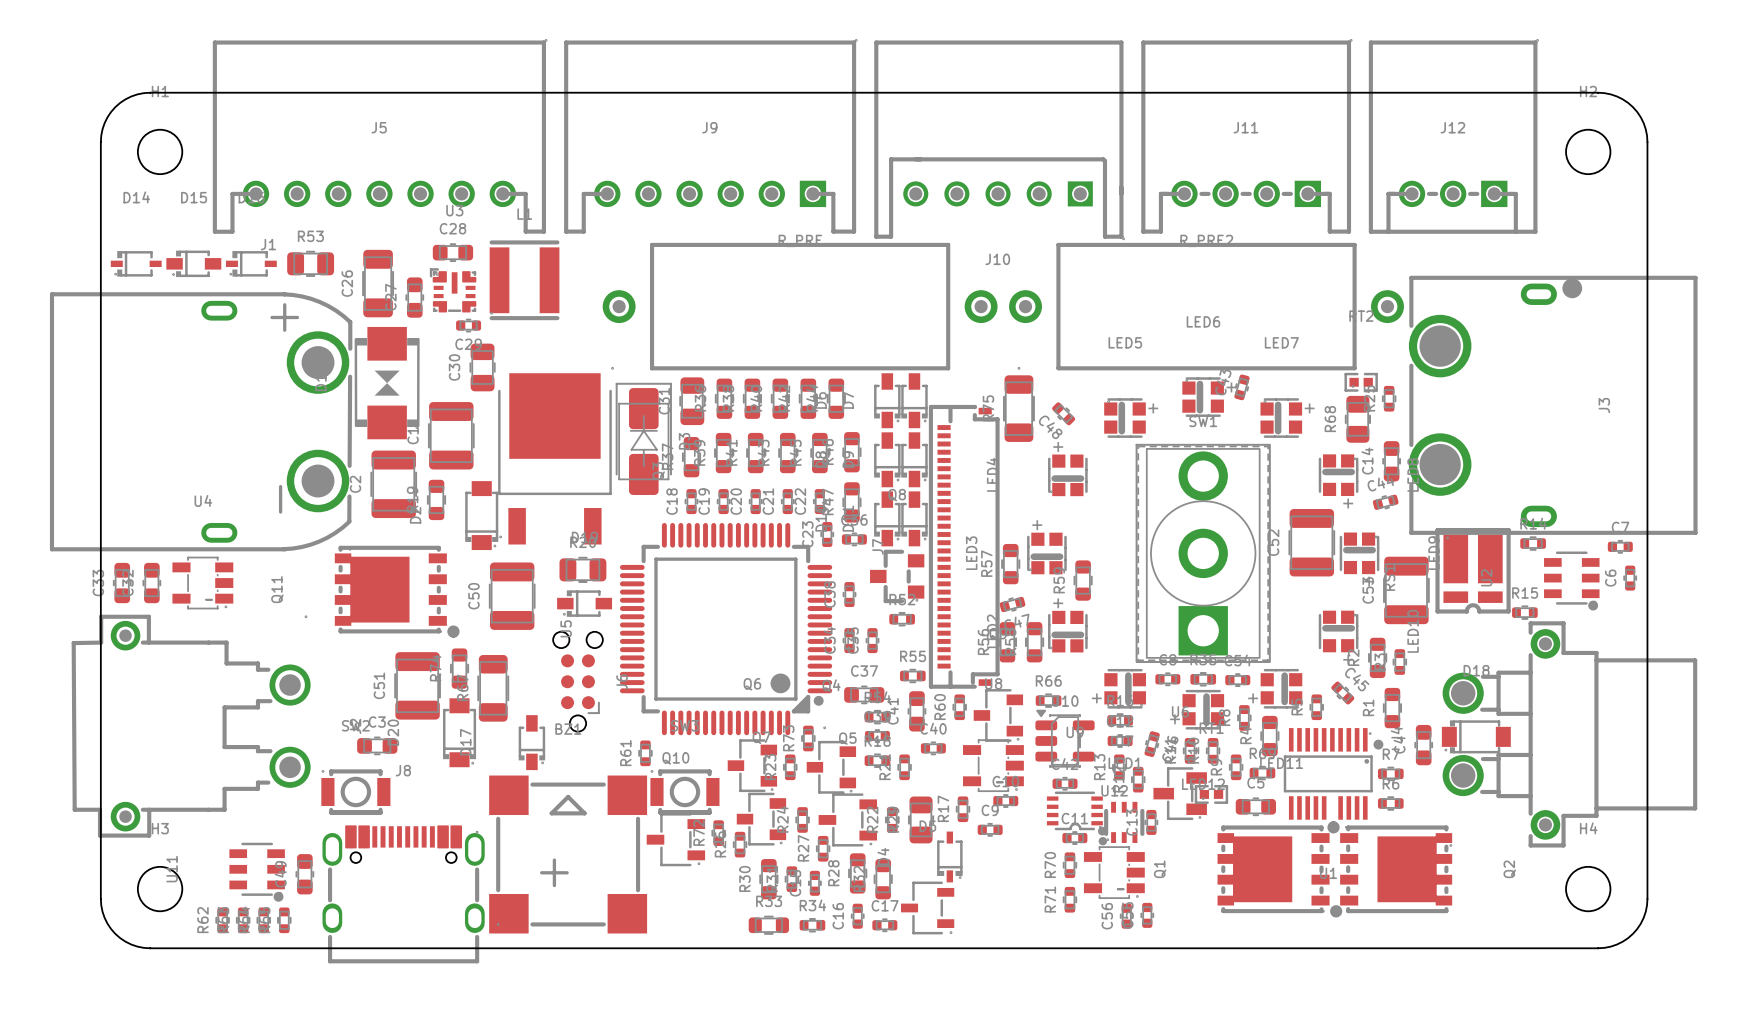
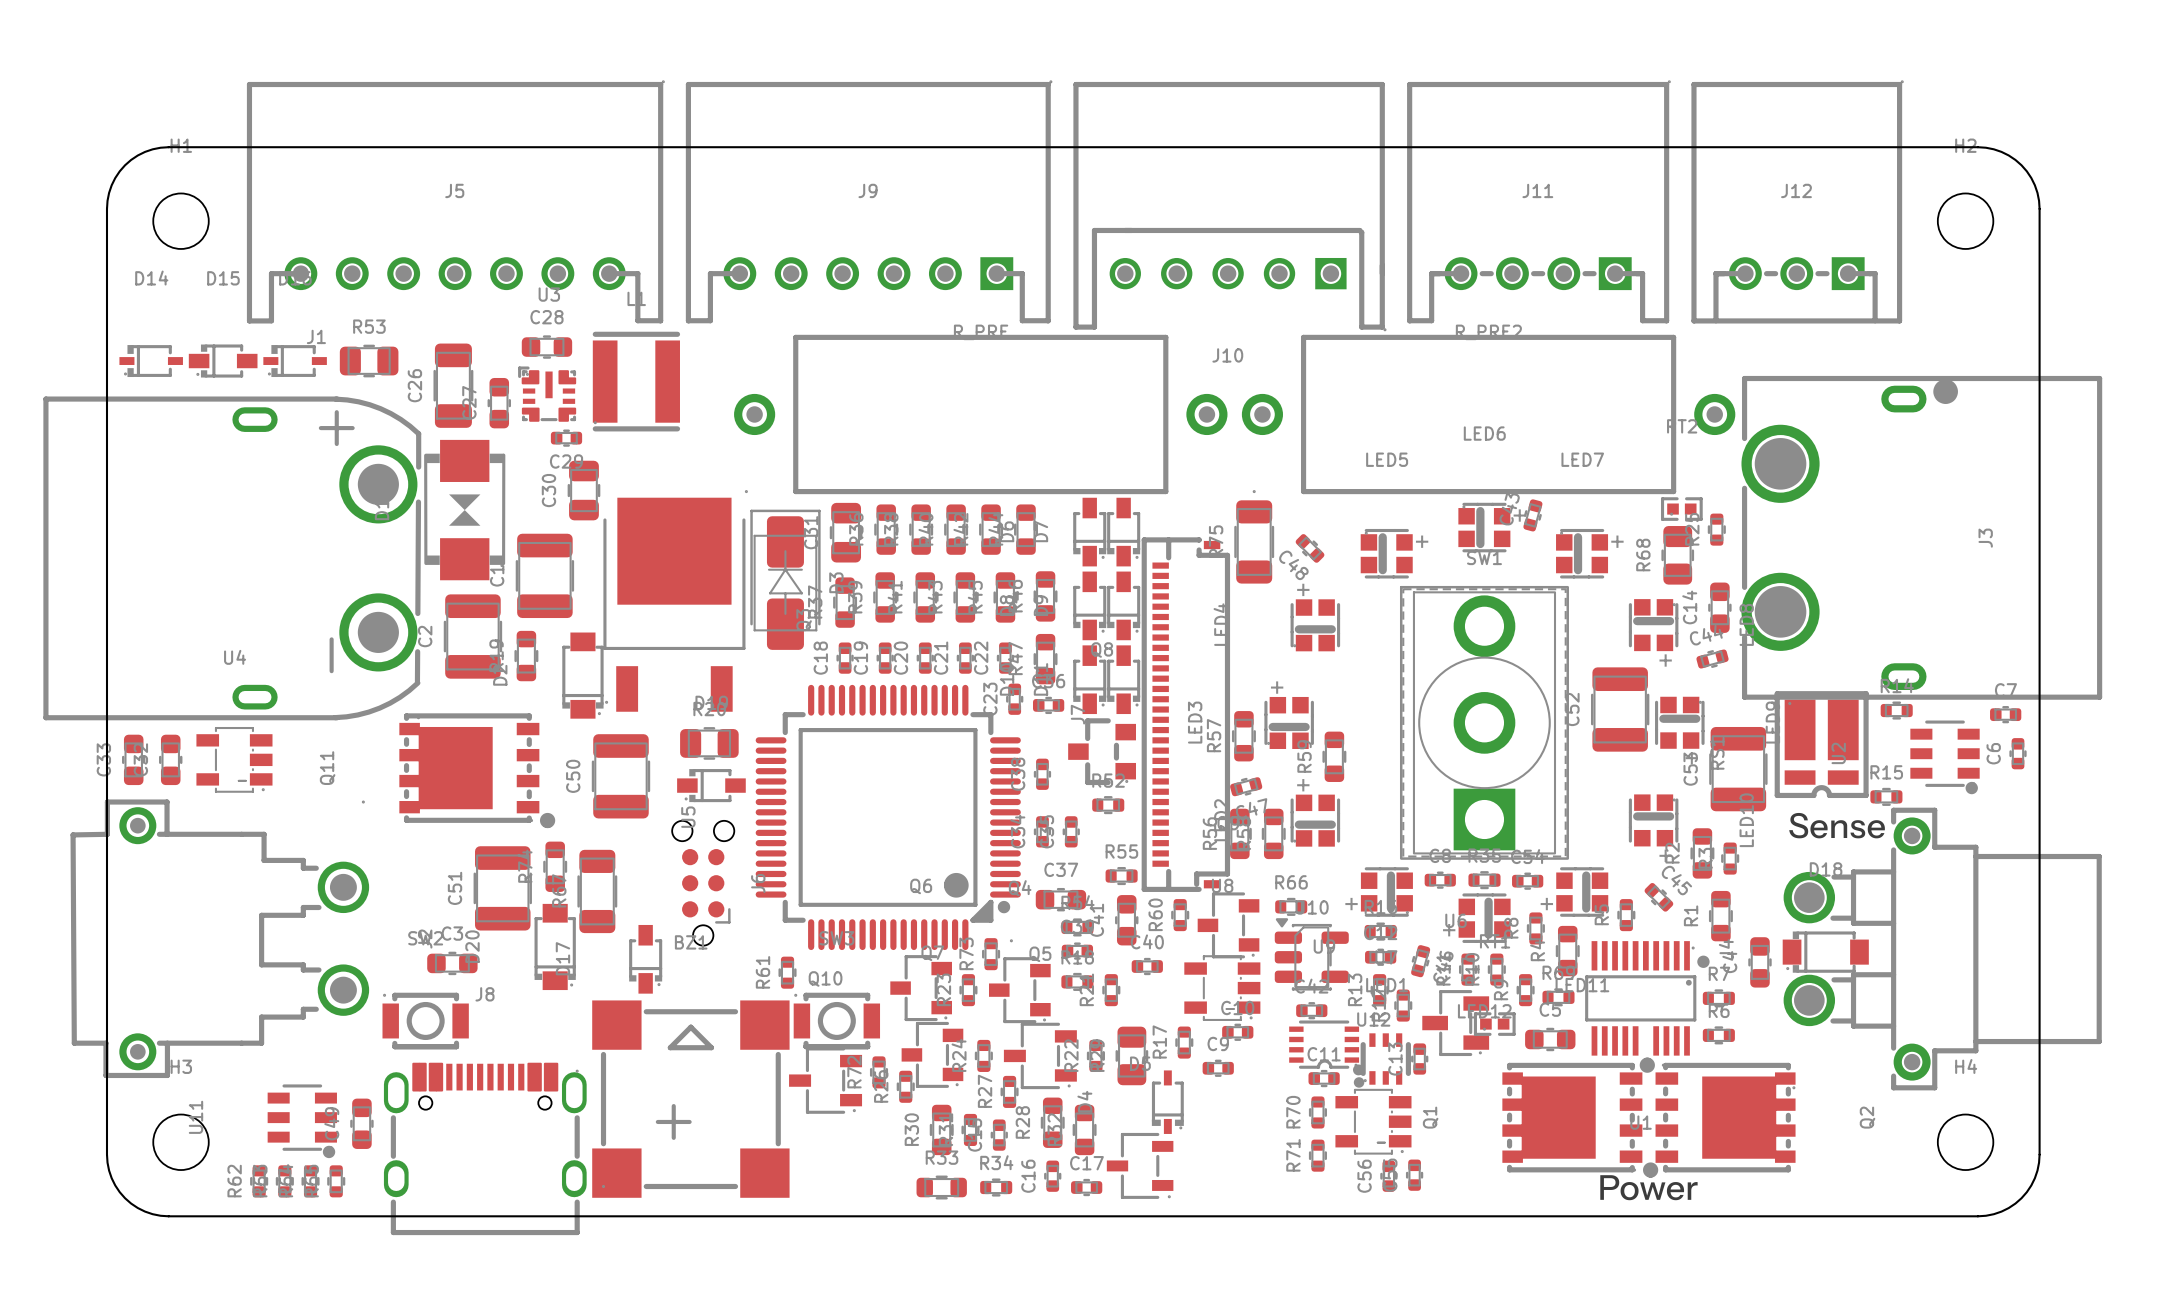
drawing: none -> [1789, 812, 1885, 839]
drawing: none -> [1600, 1175, 1698, 1201]

